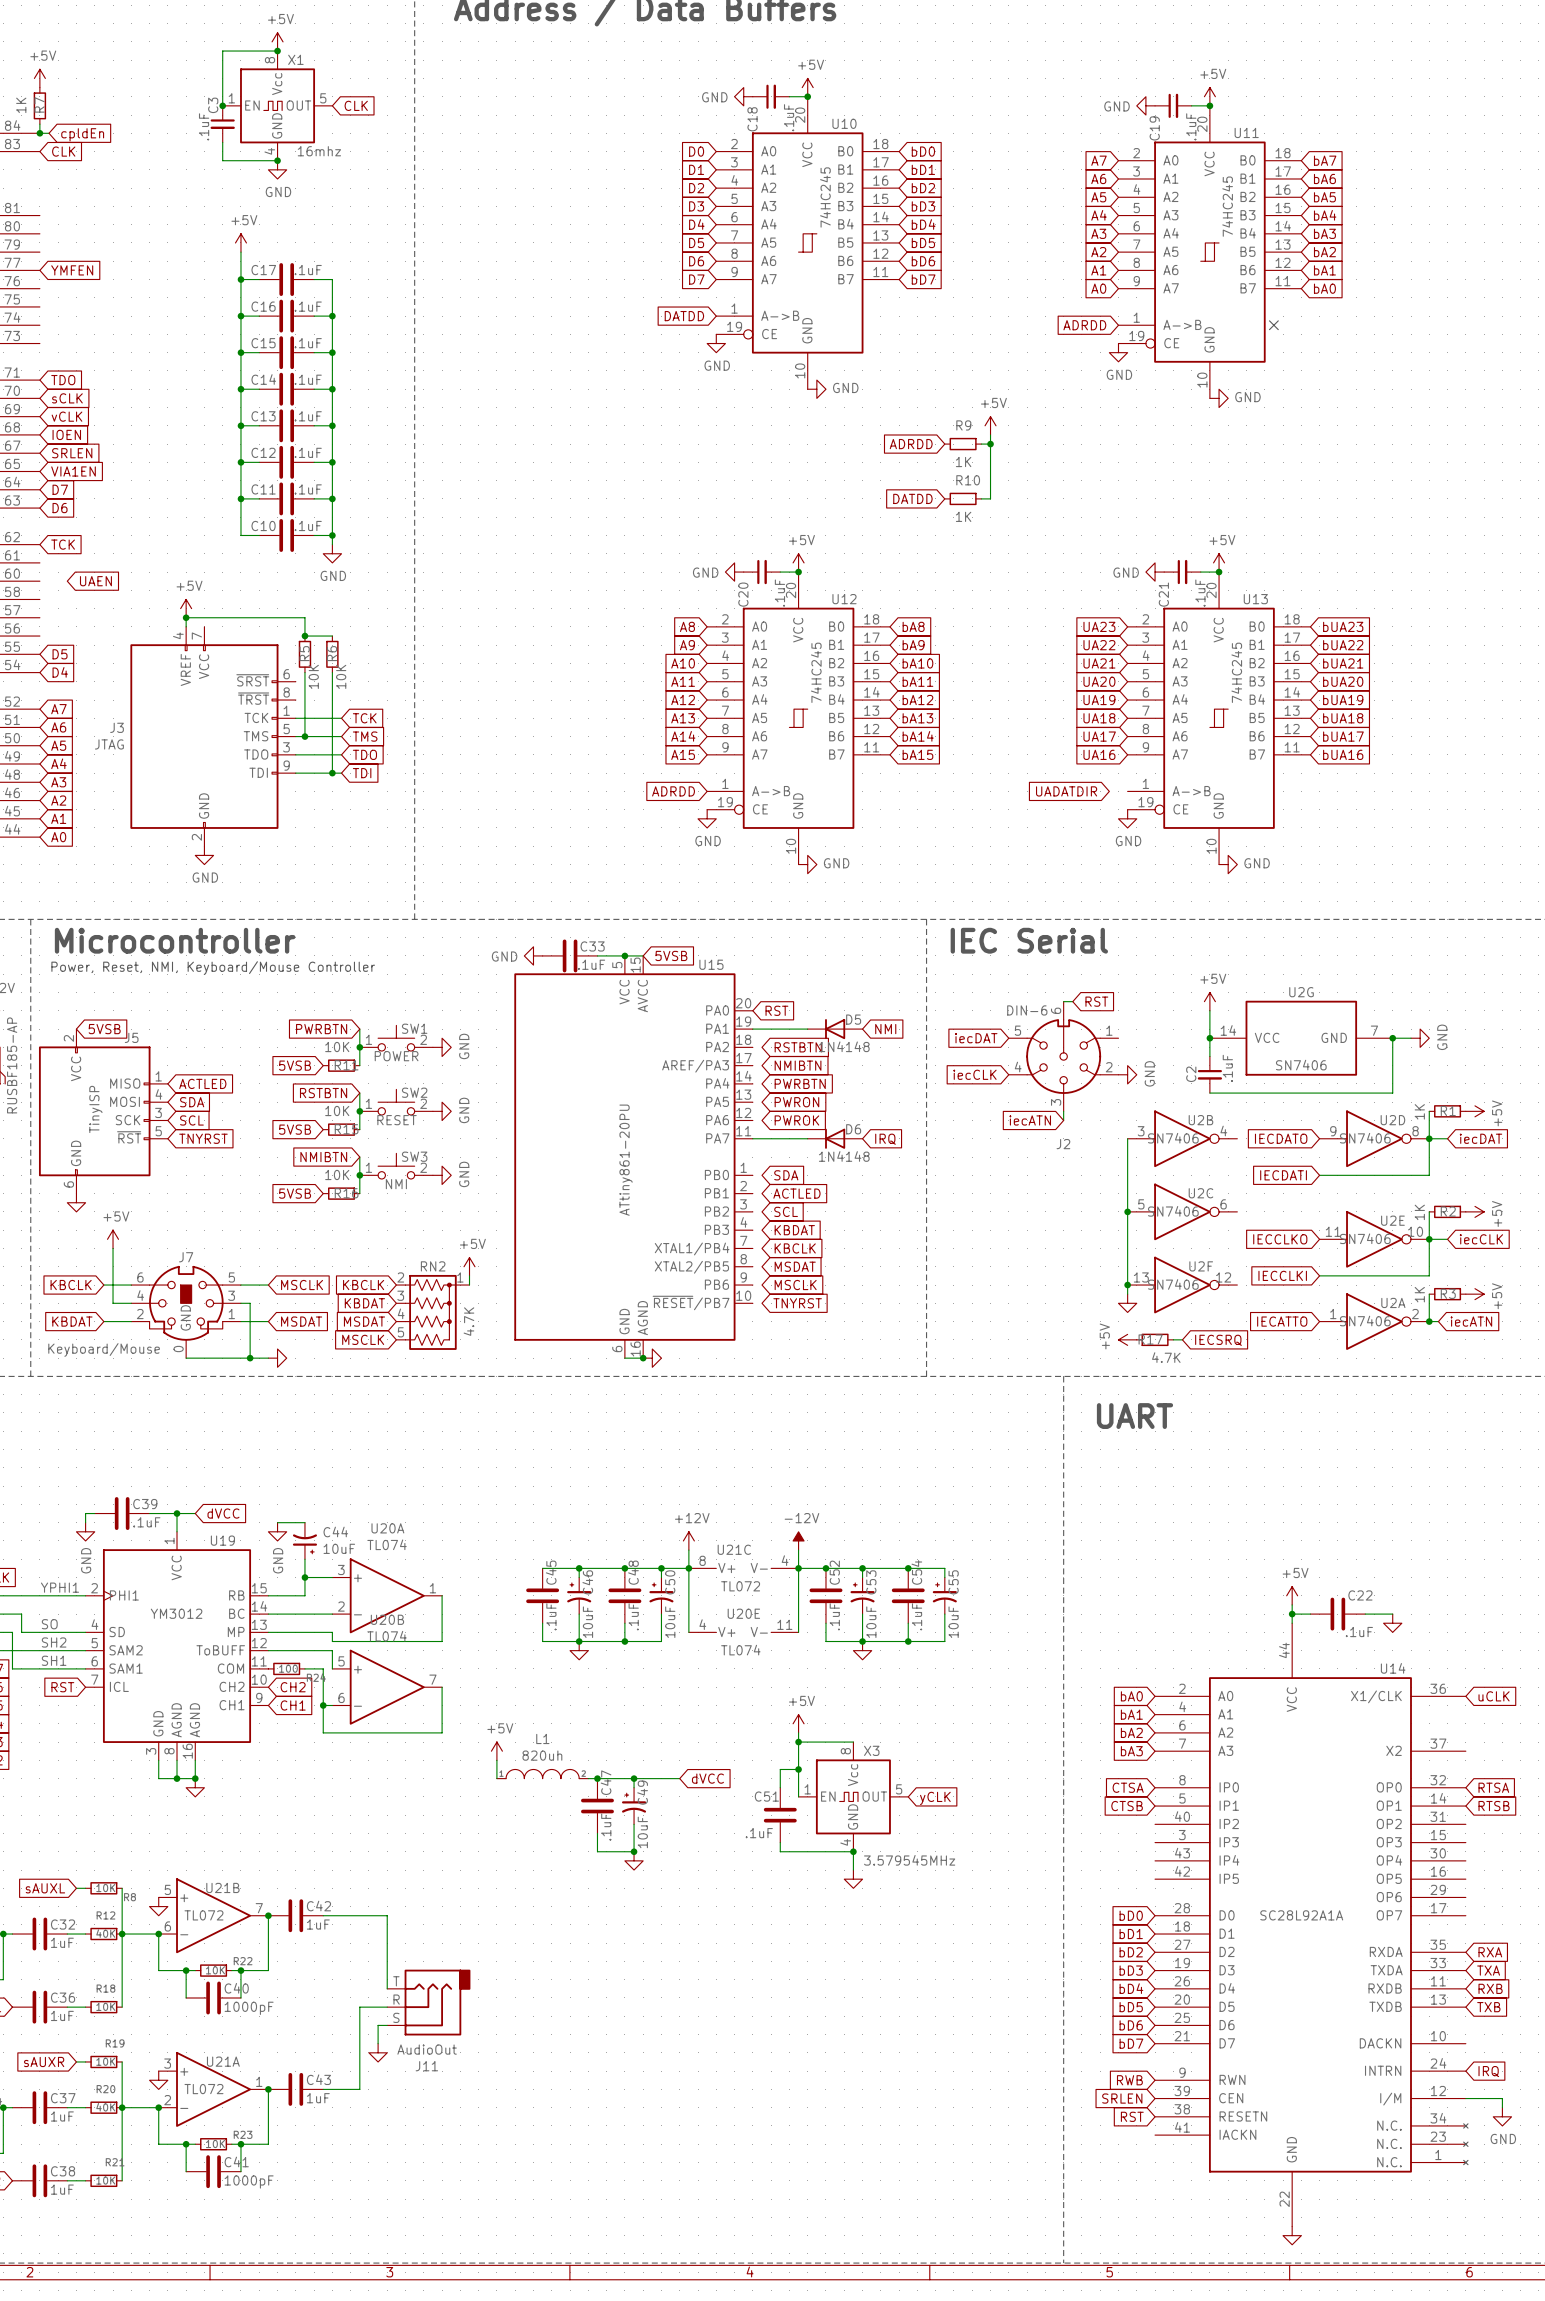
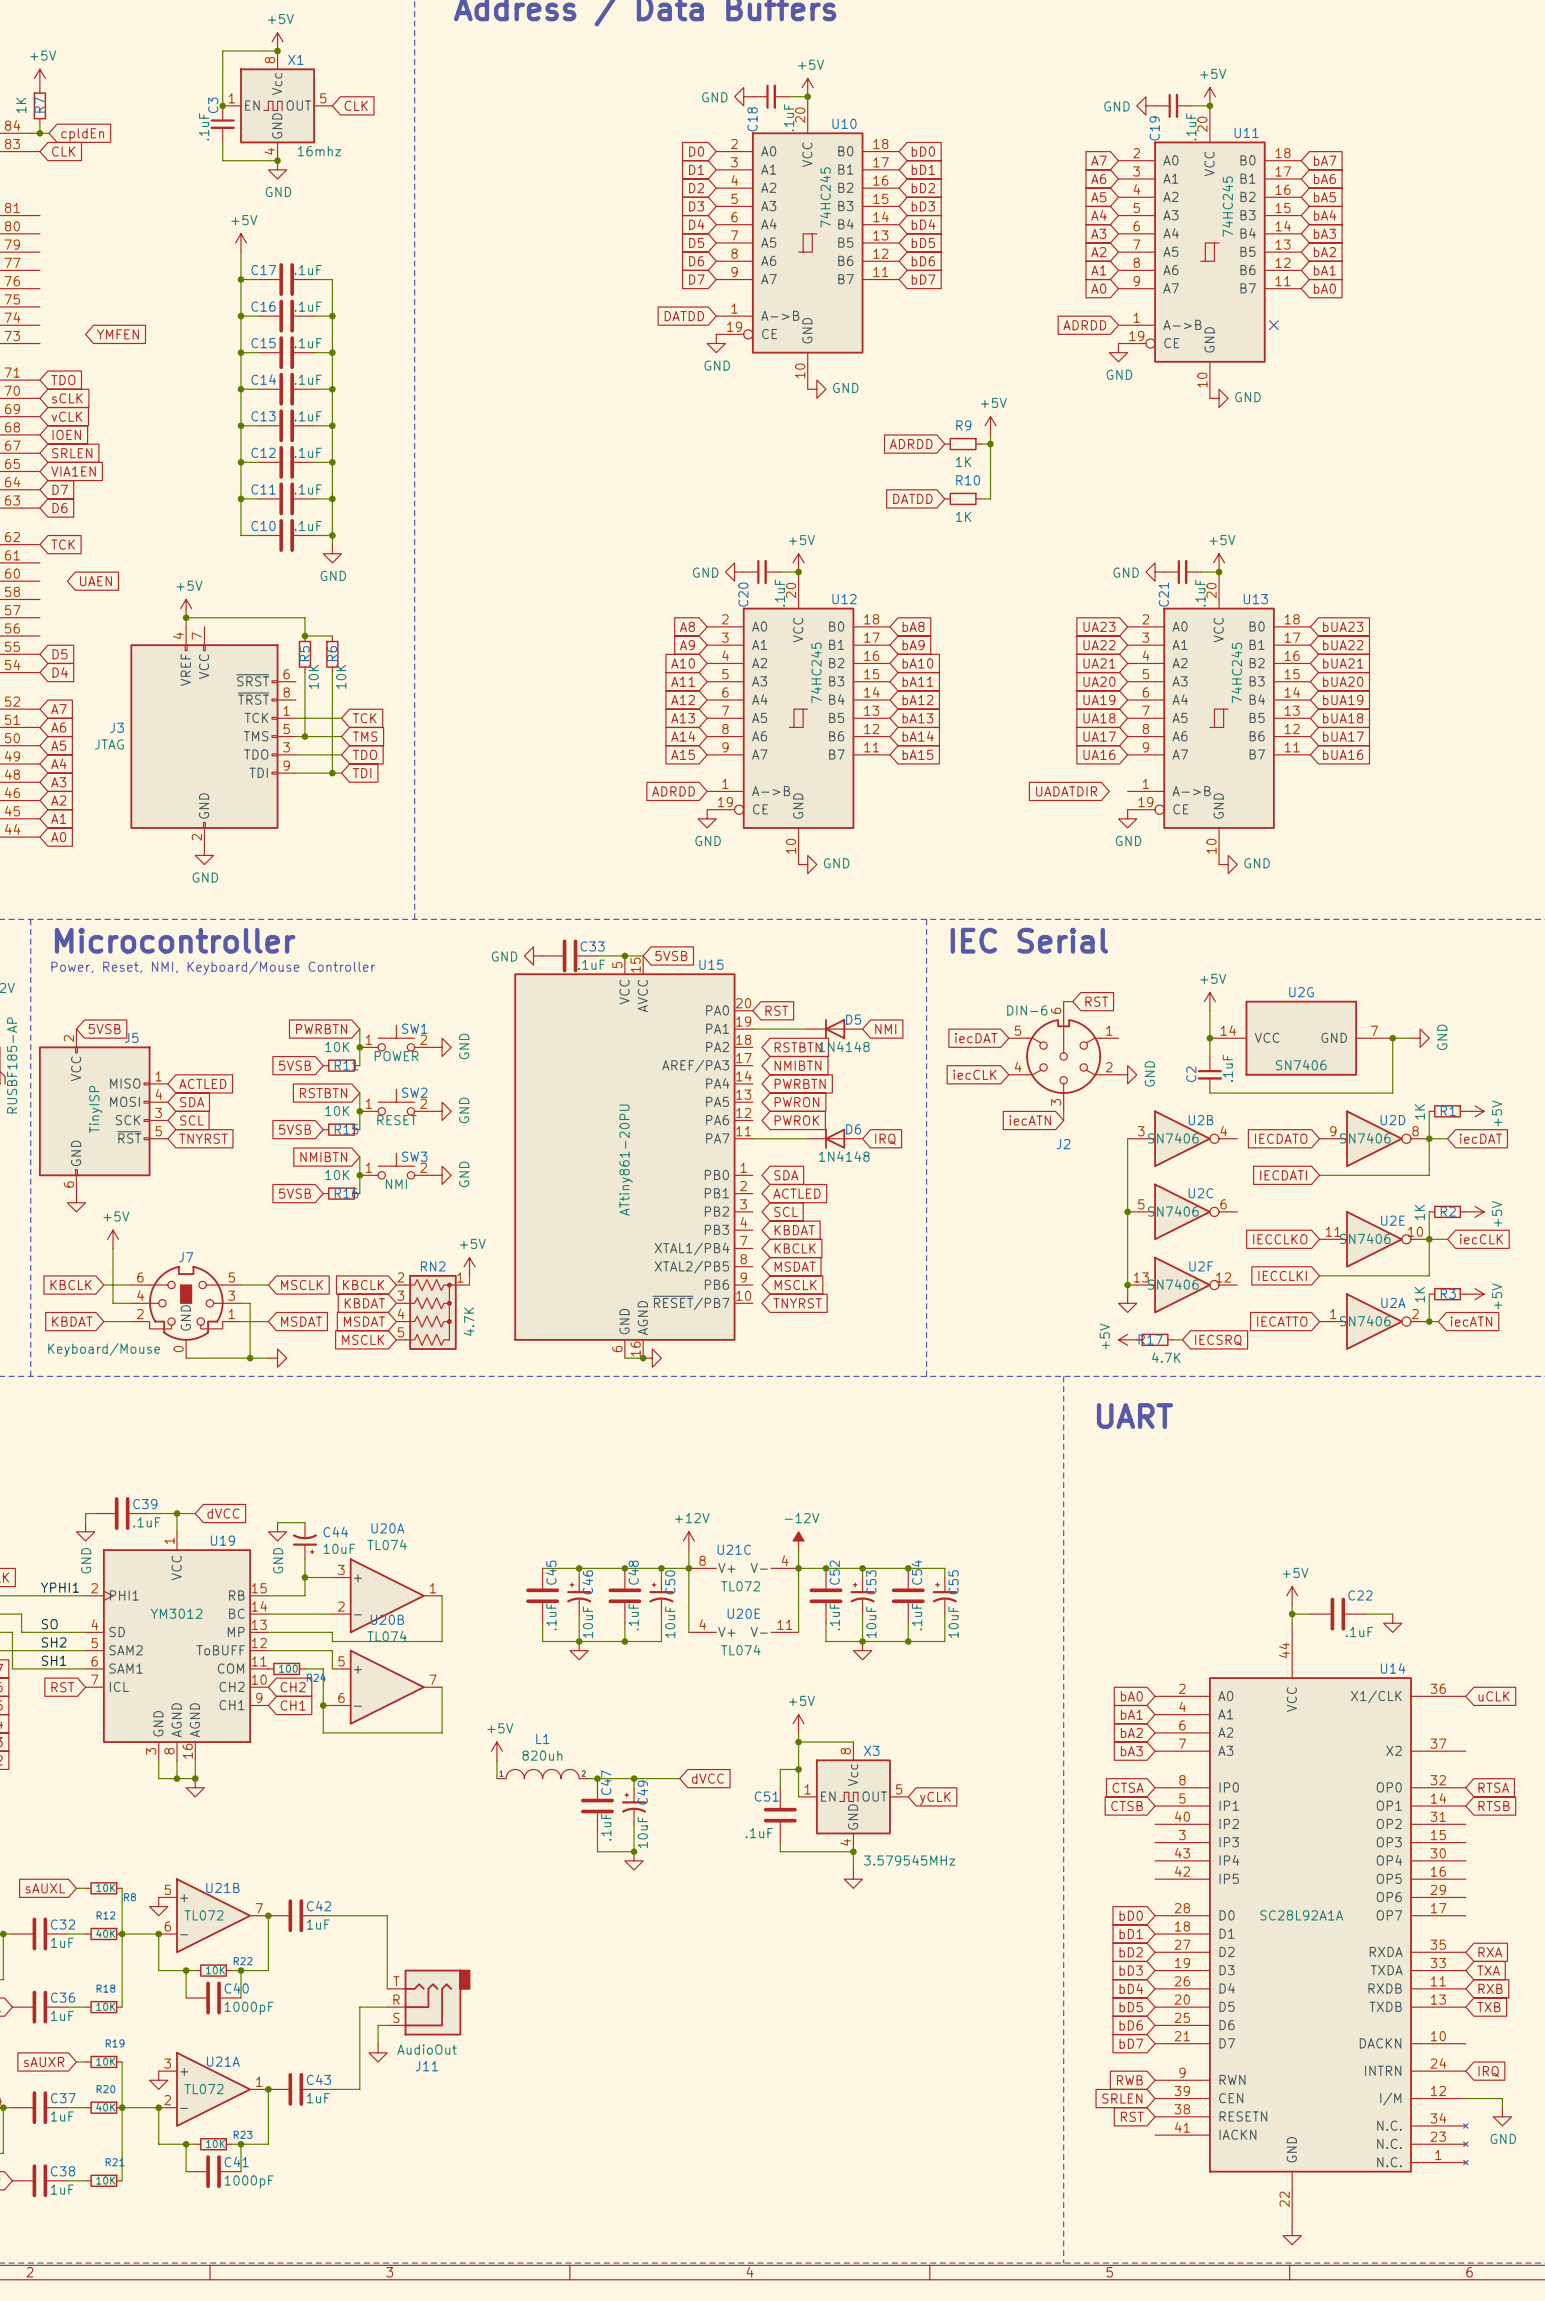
global label position: YMFEN (72, 270) -> YMFEN (117, 334)

